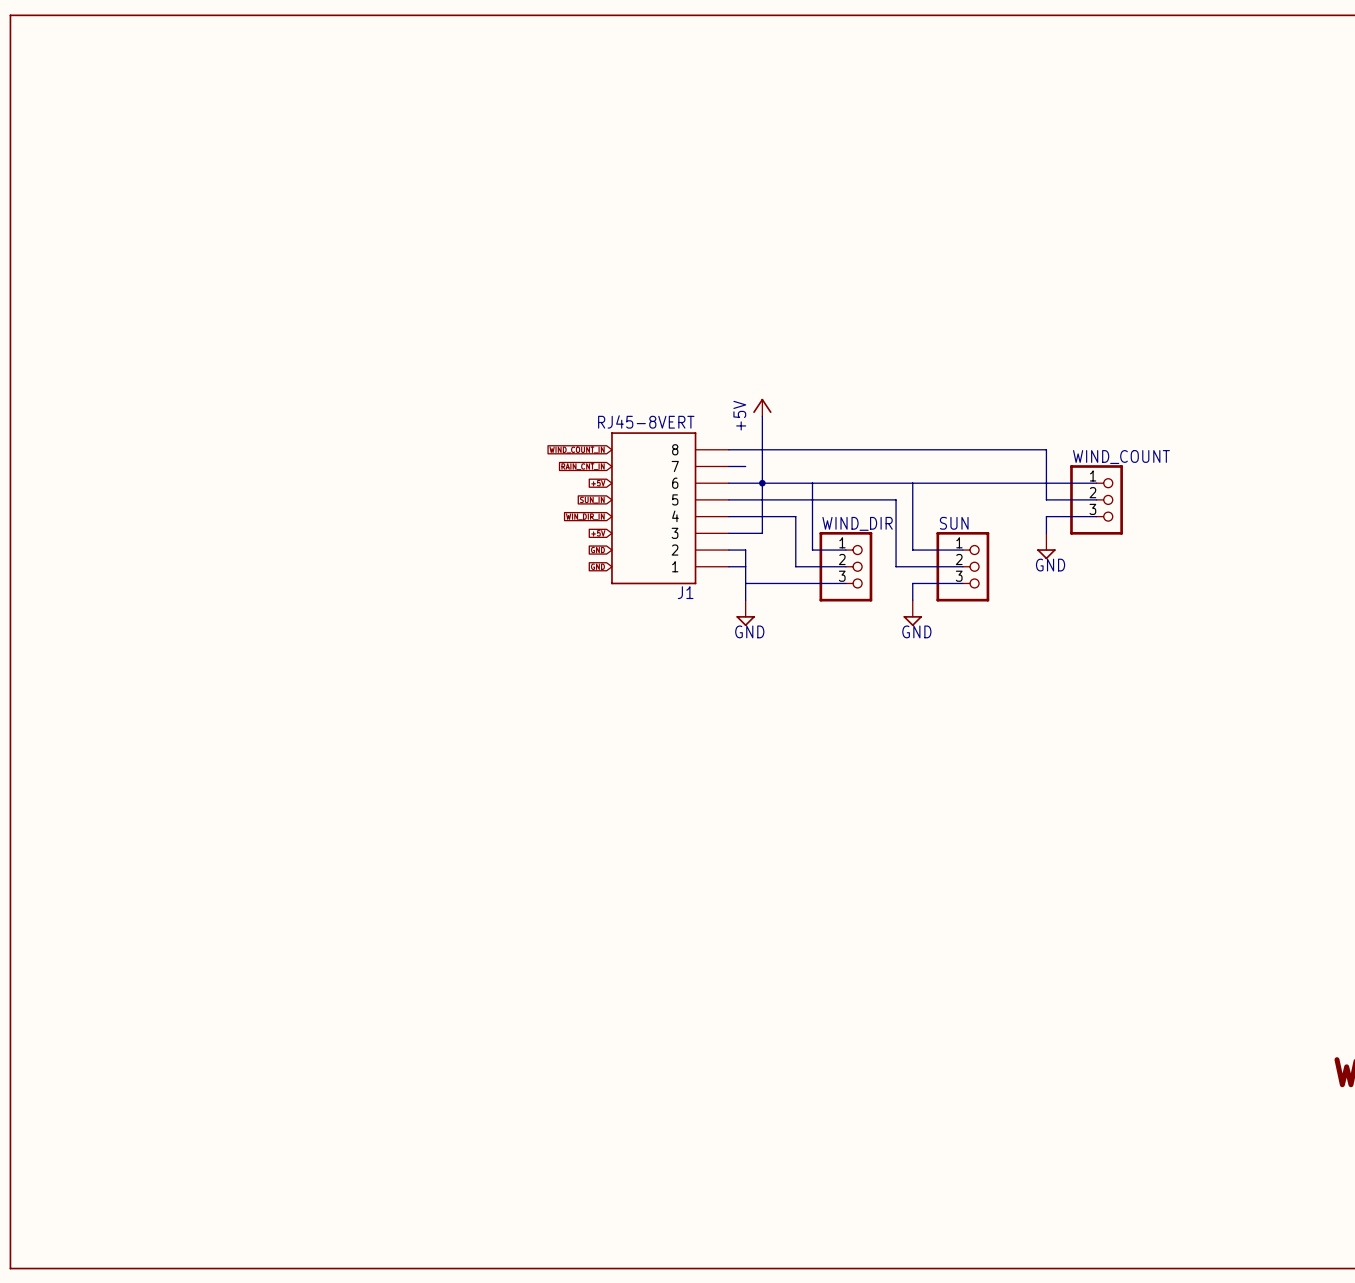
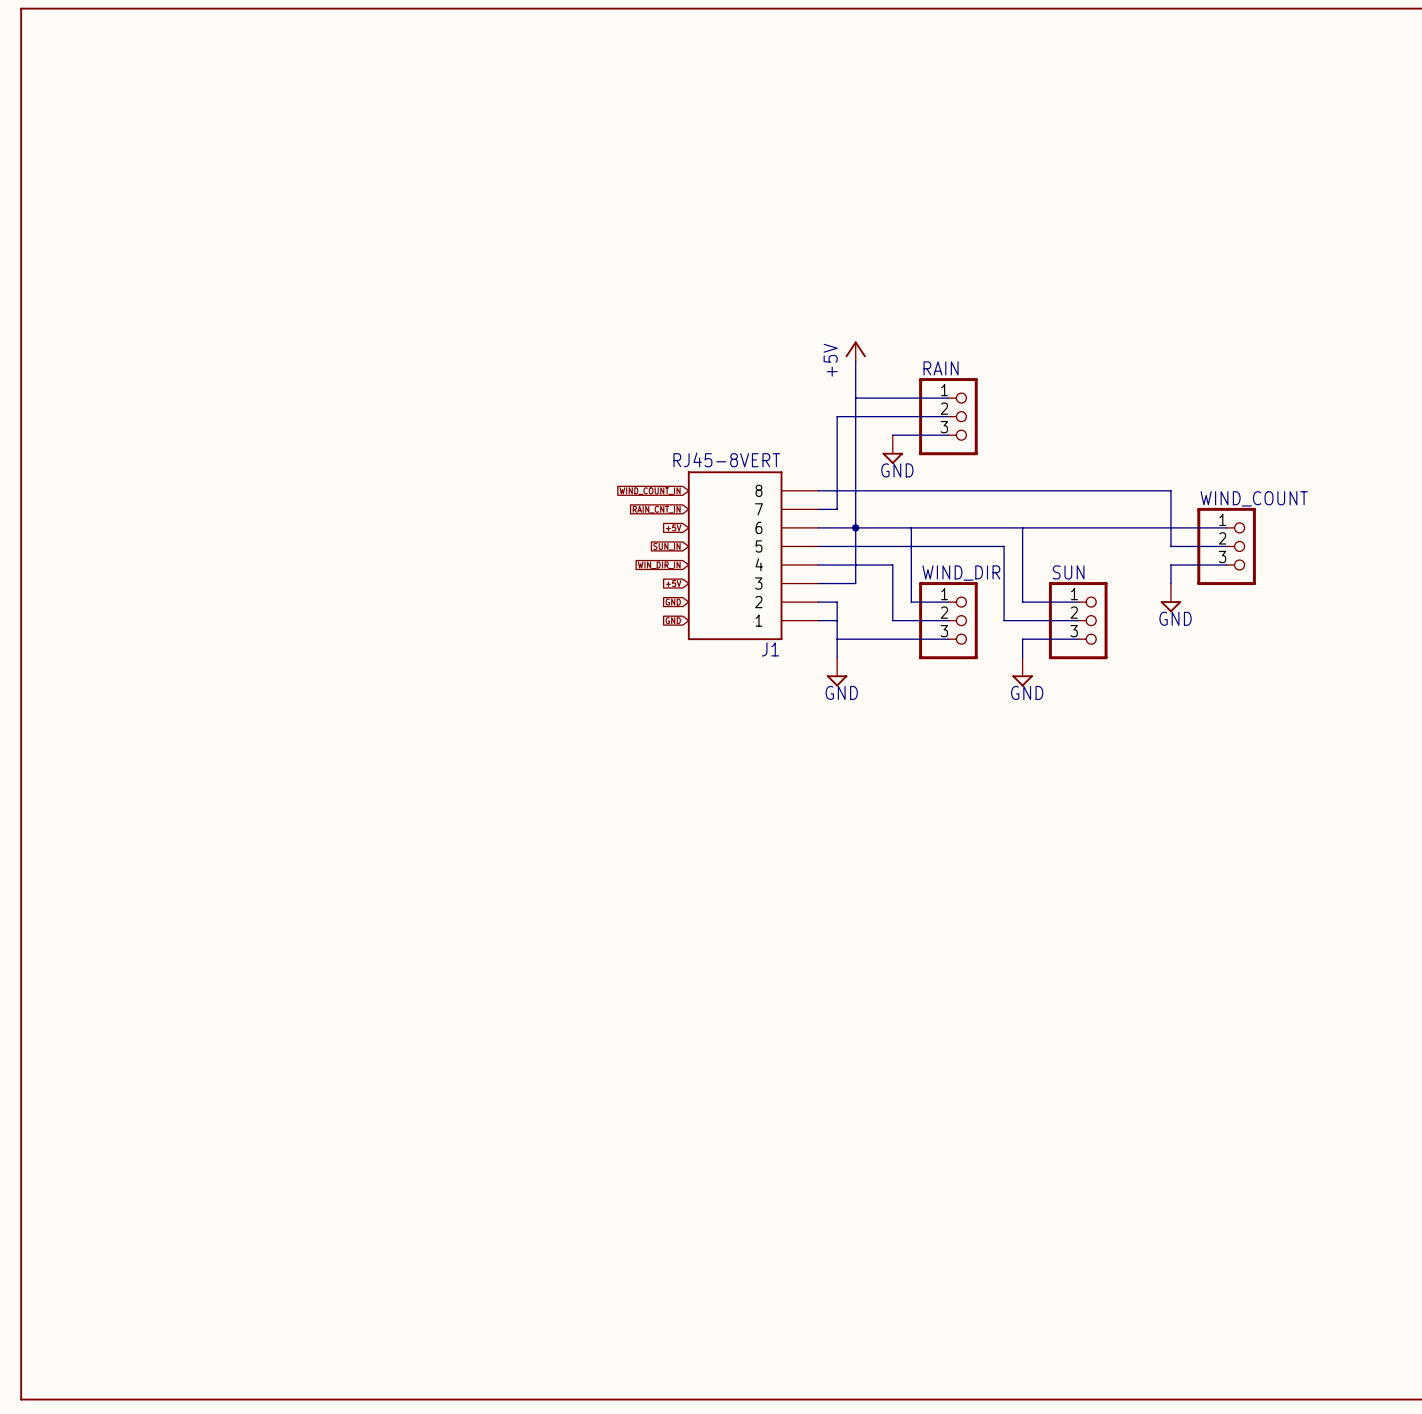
wire: none -> (855, 361) (855, 453)
wire: none -> (855, 398) (948, 398)
wire: none -> (948, 416) (837, 416) (837, 509)
RAIN: none -> (948, 416)
wire: none -> (892, 435) (948, 435)
power symbol position: +5V (762, 407) -> +5V (855, 351)
power symbol: none -> GND (892, 449)

